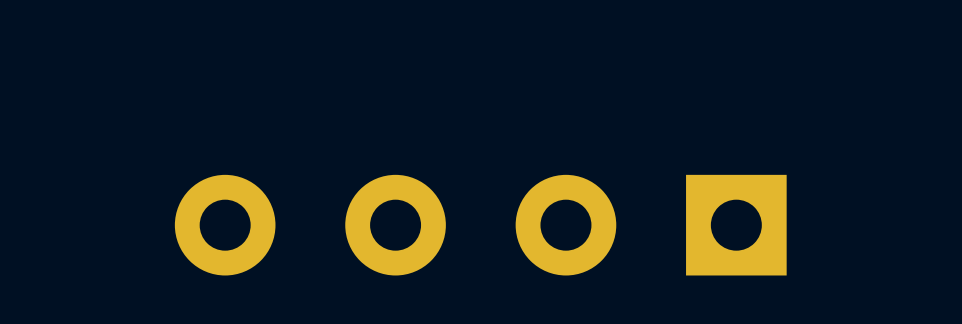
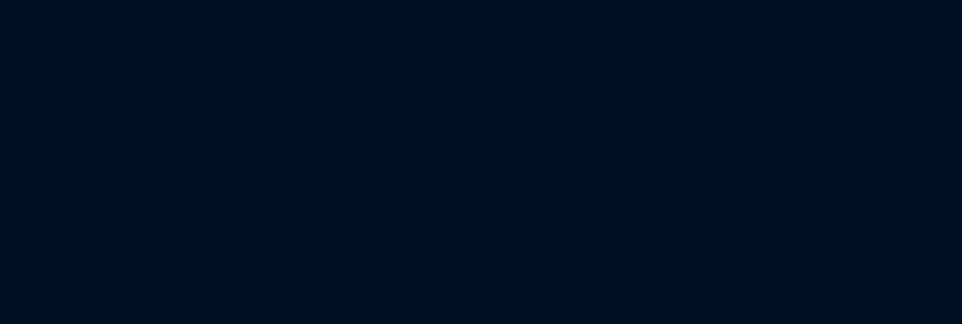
part: (480, 225) -> none

